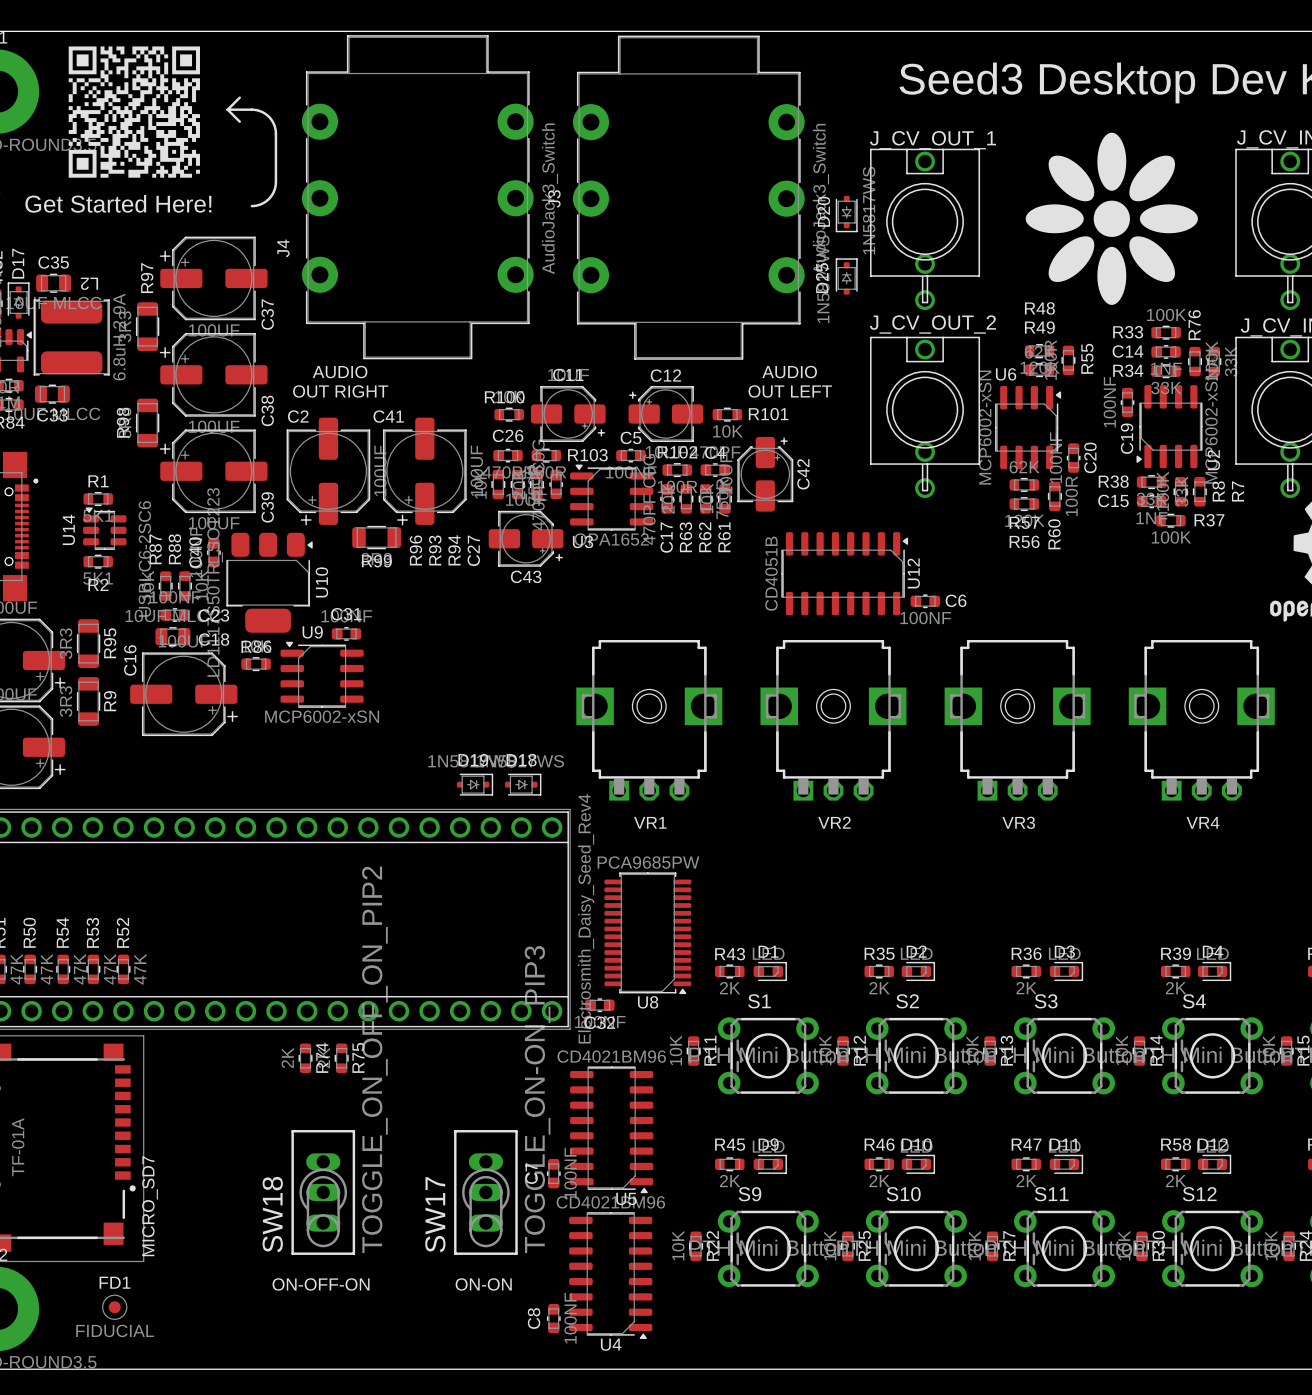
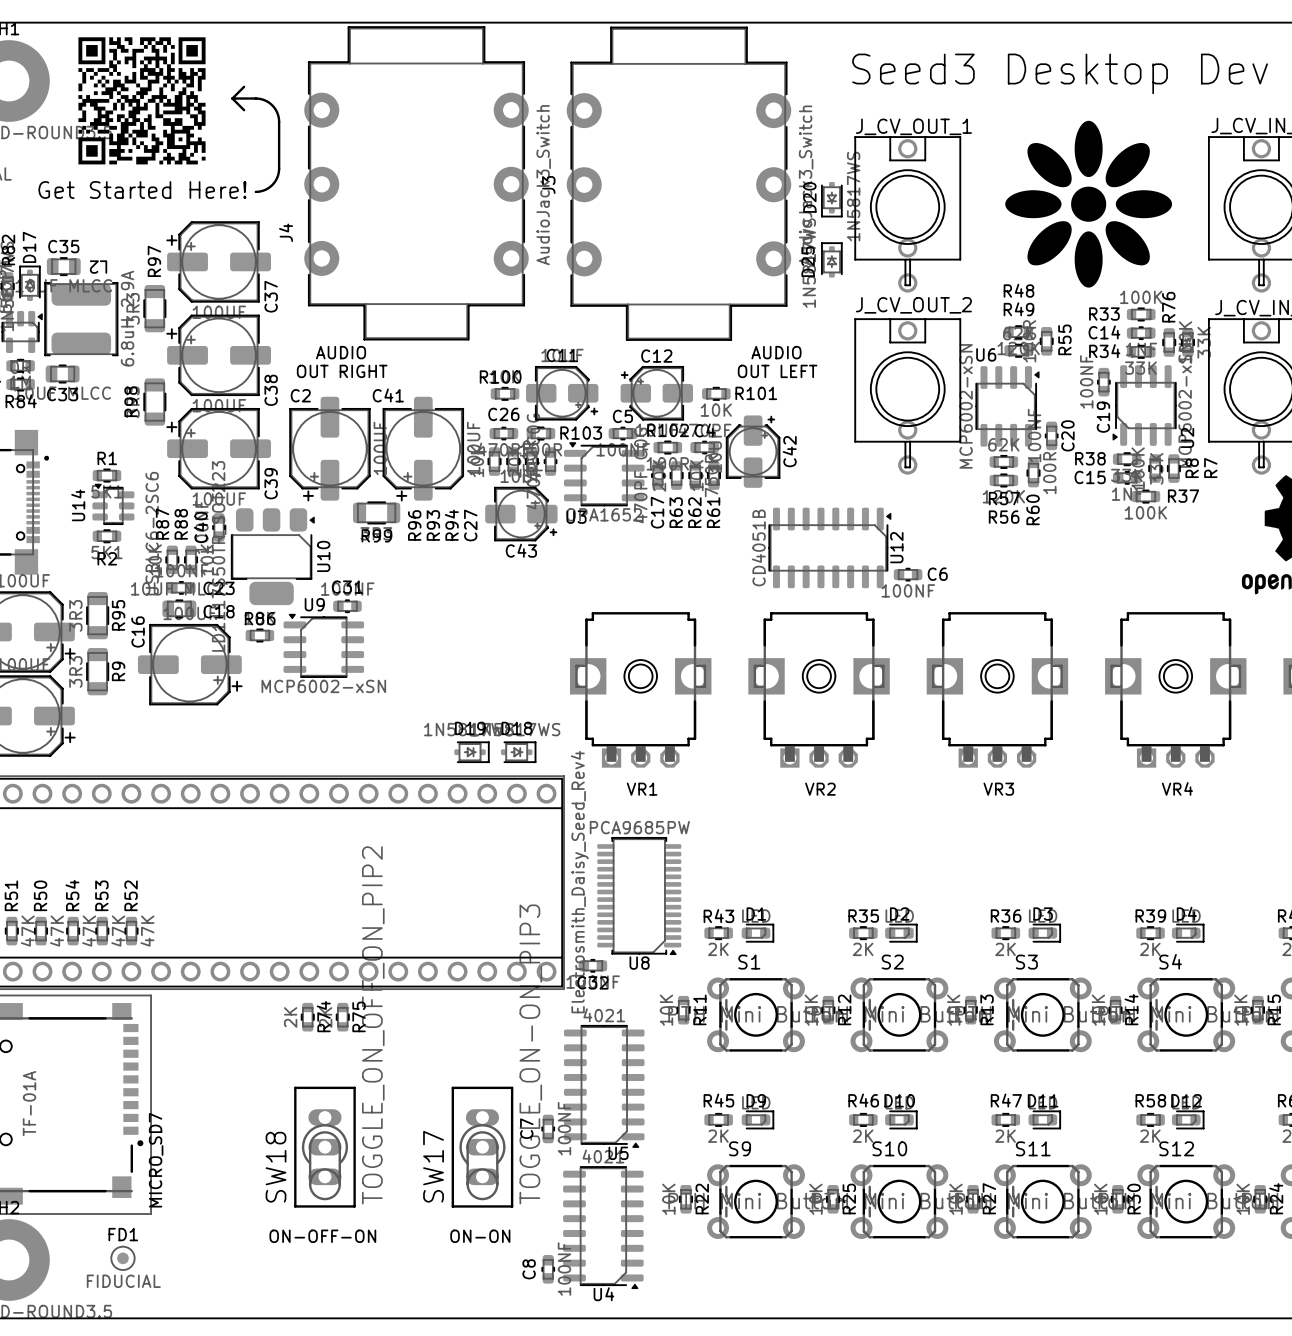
U5 value: CD4021BM96 (611, 1056) -> 4021 (604, 1015)
U4 value: CD4021BM96 (610, 1202) -> 4021 (603, 1156)

